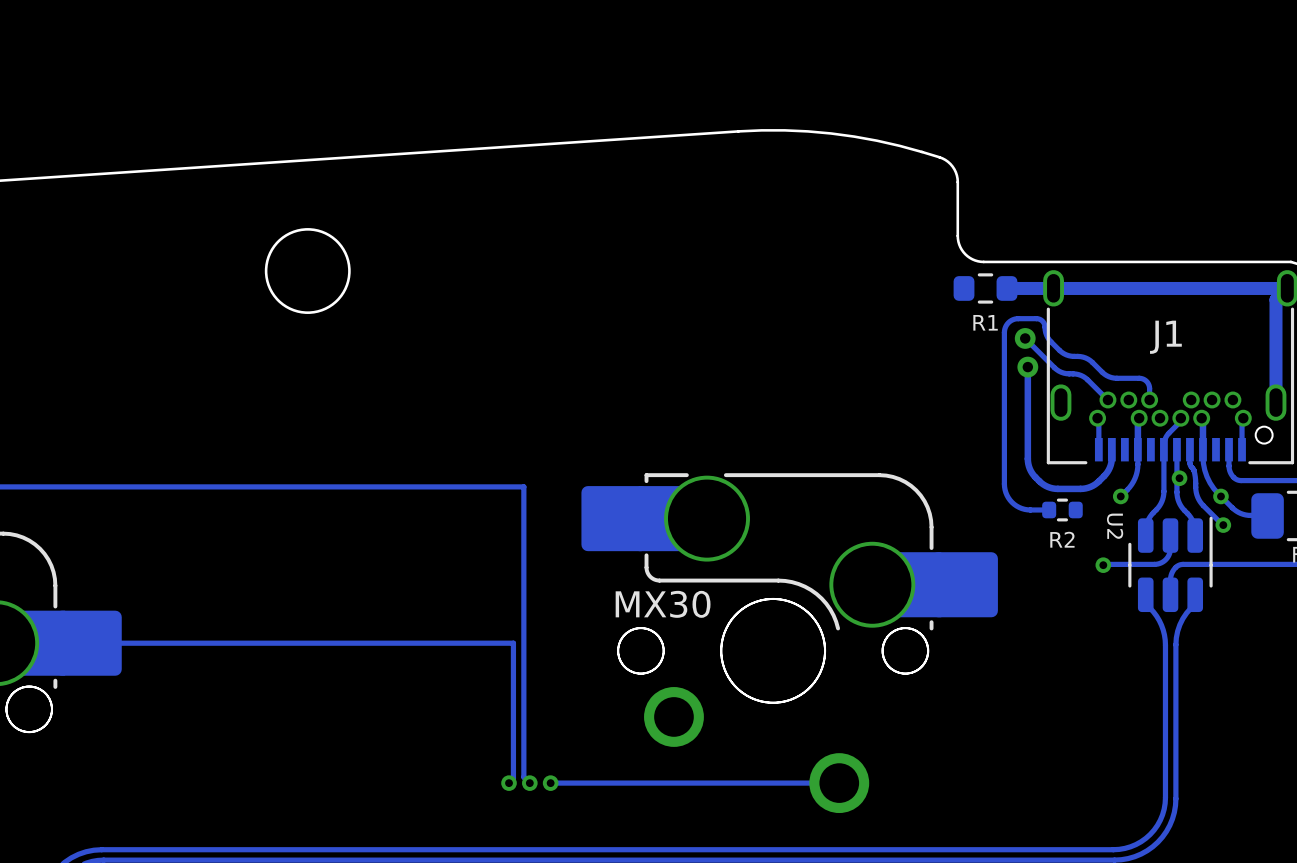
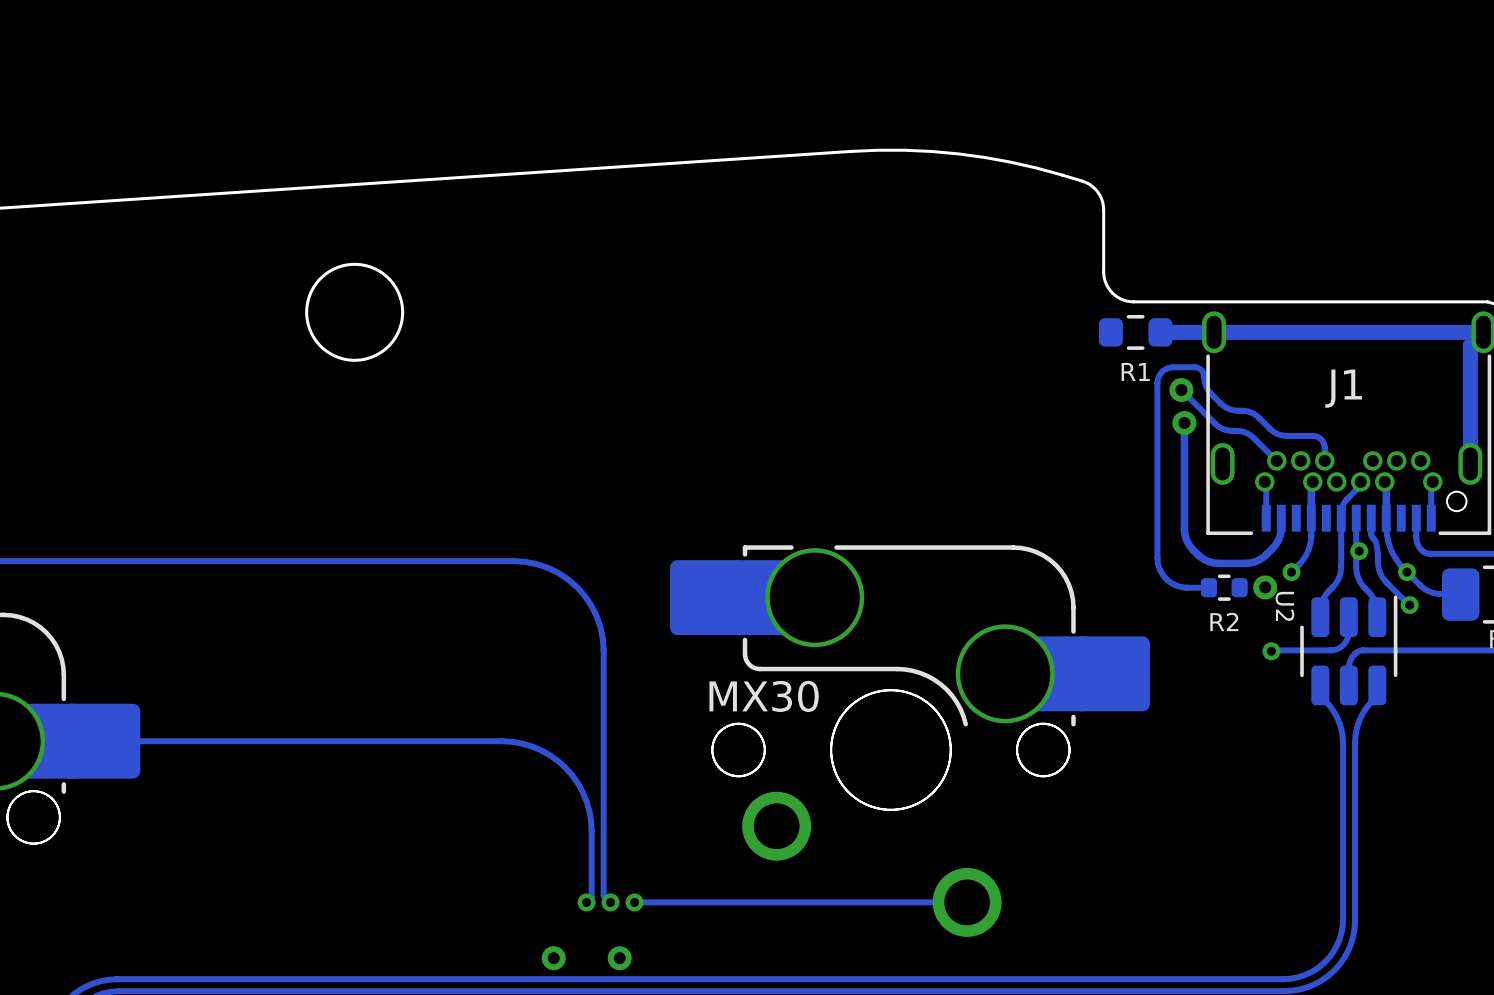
track: (445, 486) (523, 486) (523, 565) -> (513, 561) (525, 561) (548, 567) (568, 579) (577, 587) (591, 606) (596, 616) (600, 627) (603, 651)
via: none -> (1265, 587)
track: (43, 643) (513, 643) (513, 721) -> (50, 741) (511, 741) (540, 750) (565, 767) (582, 792) (589, 811) (591, 831)
via: none -> (553, 958)
via: none -> (619, 958)

